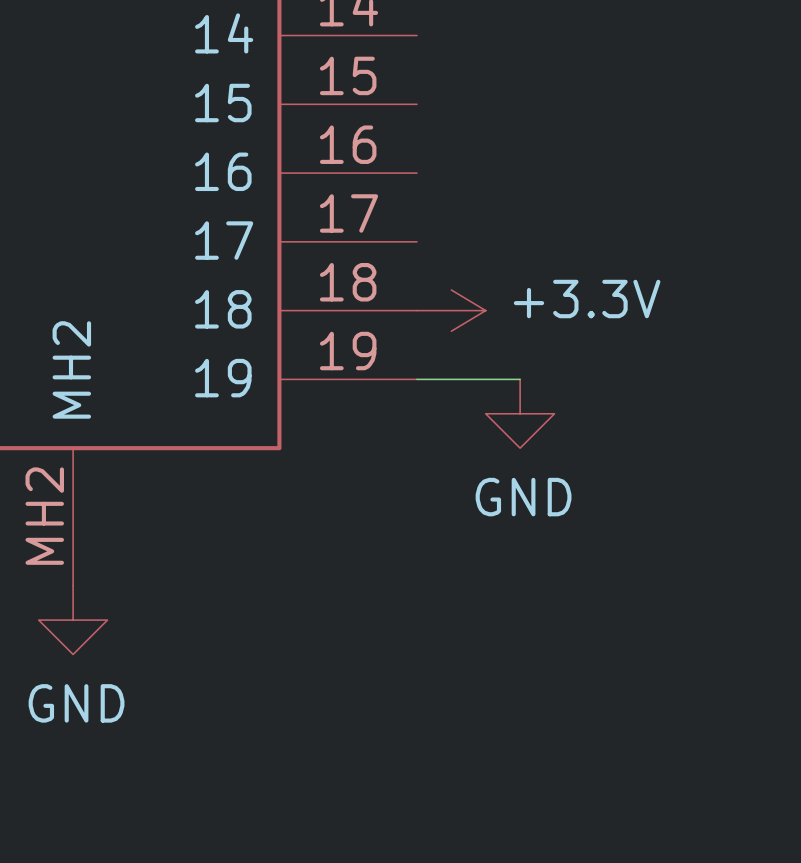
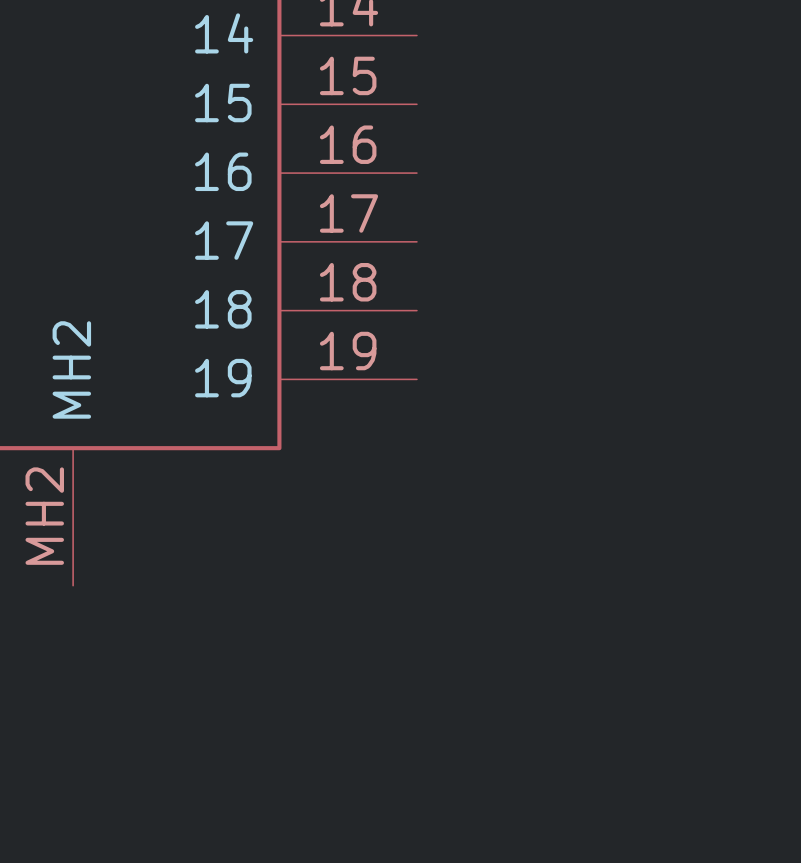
power symbol: +3.3V (451, 310) -> none
wire: (416, 379) (520, 379) -> none
power symbol: GND (520, 413) -> none
power symbol: GND (73, 620) -> none

